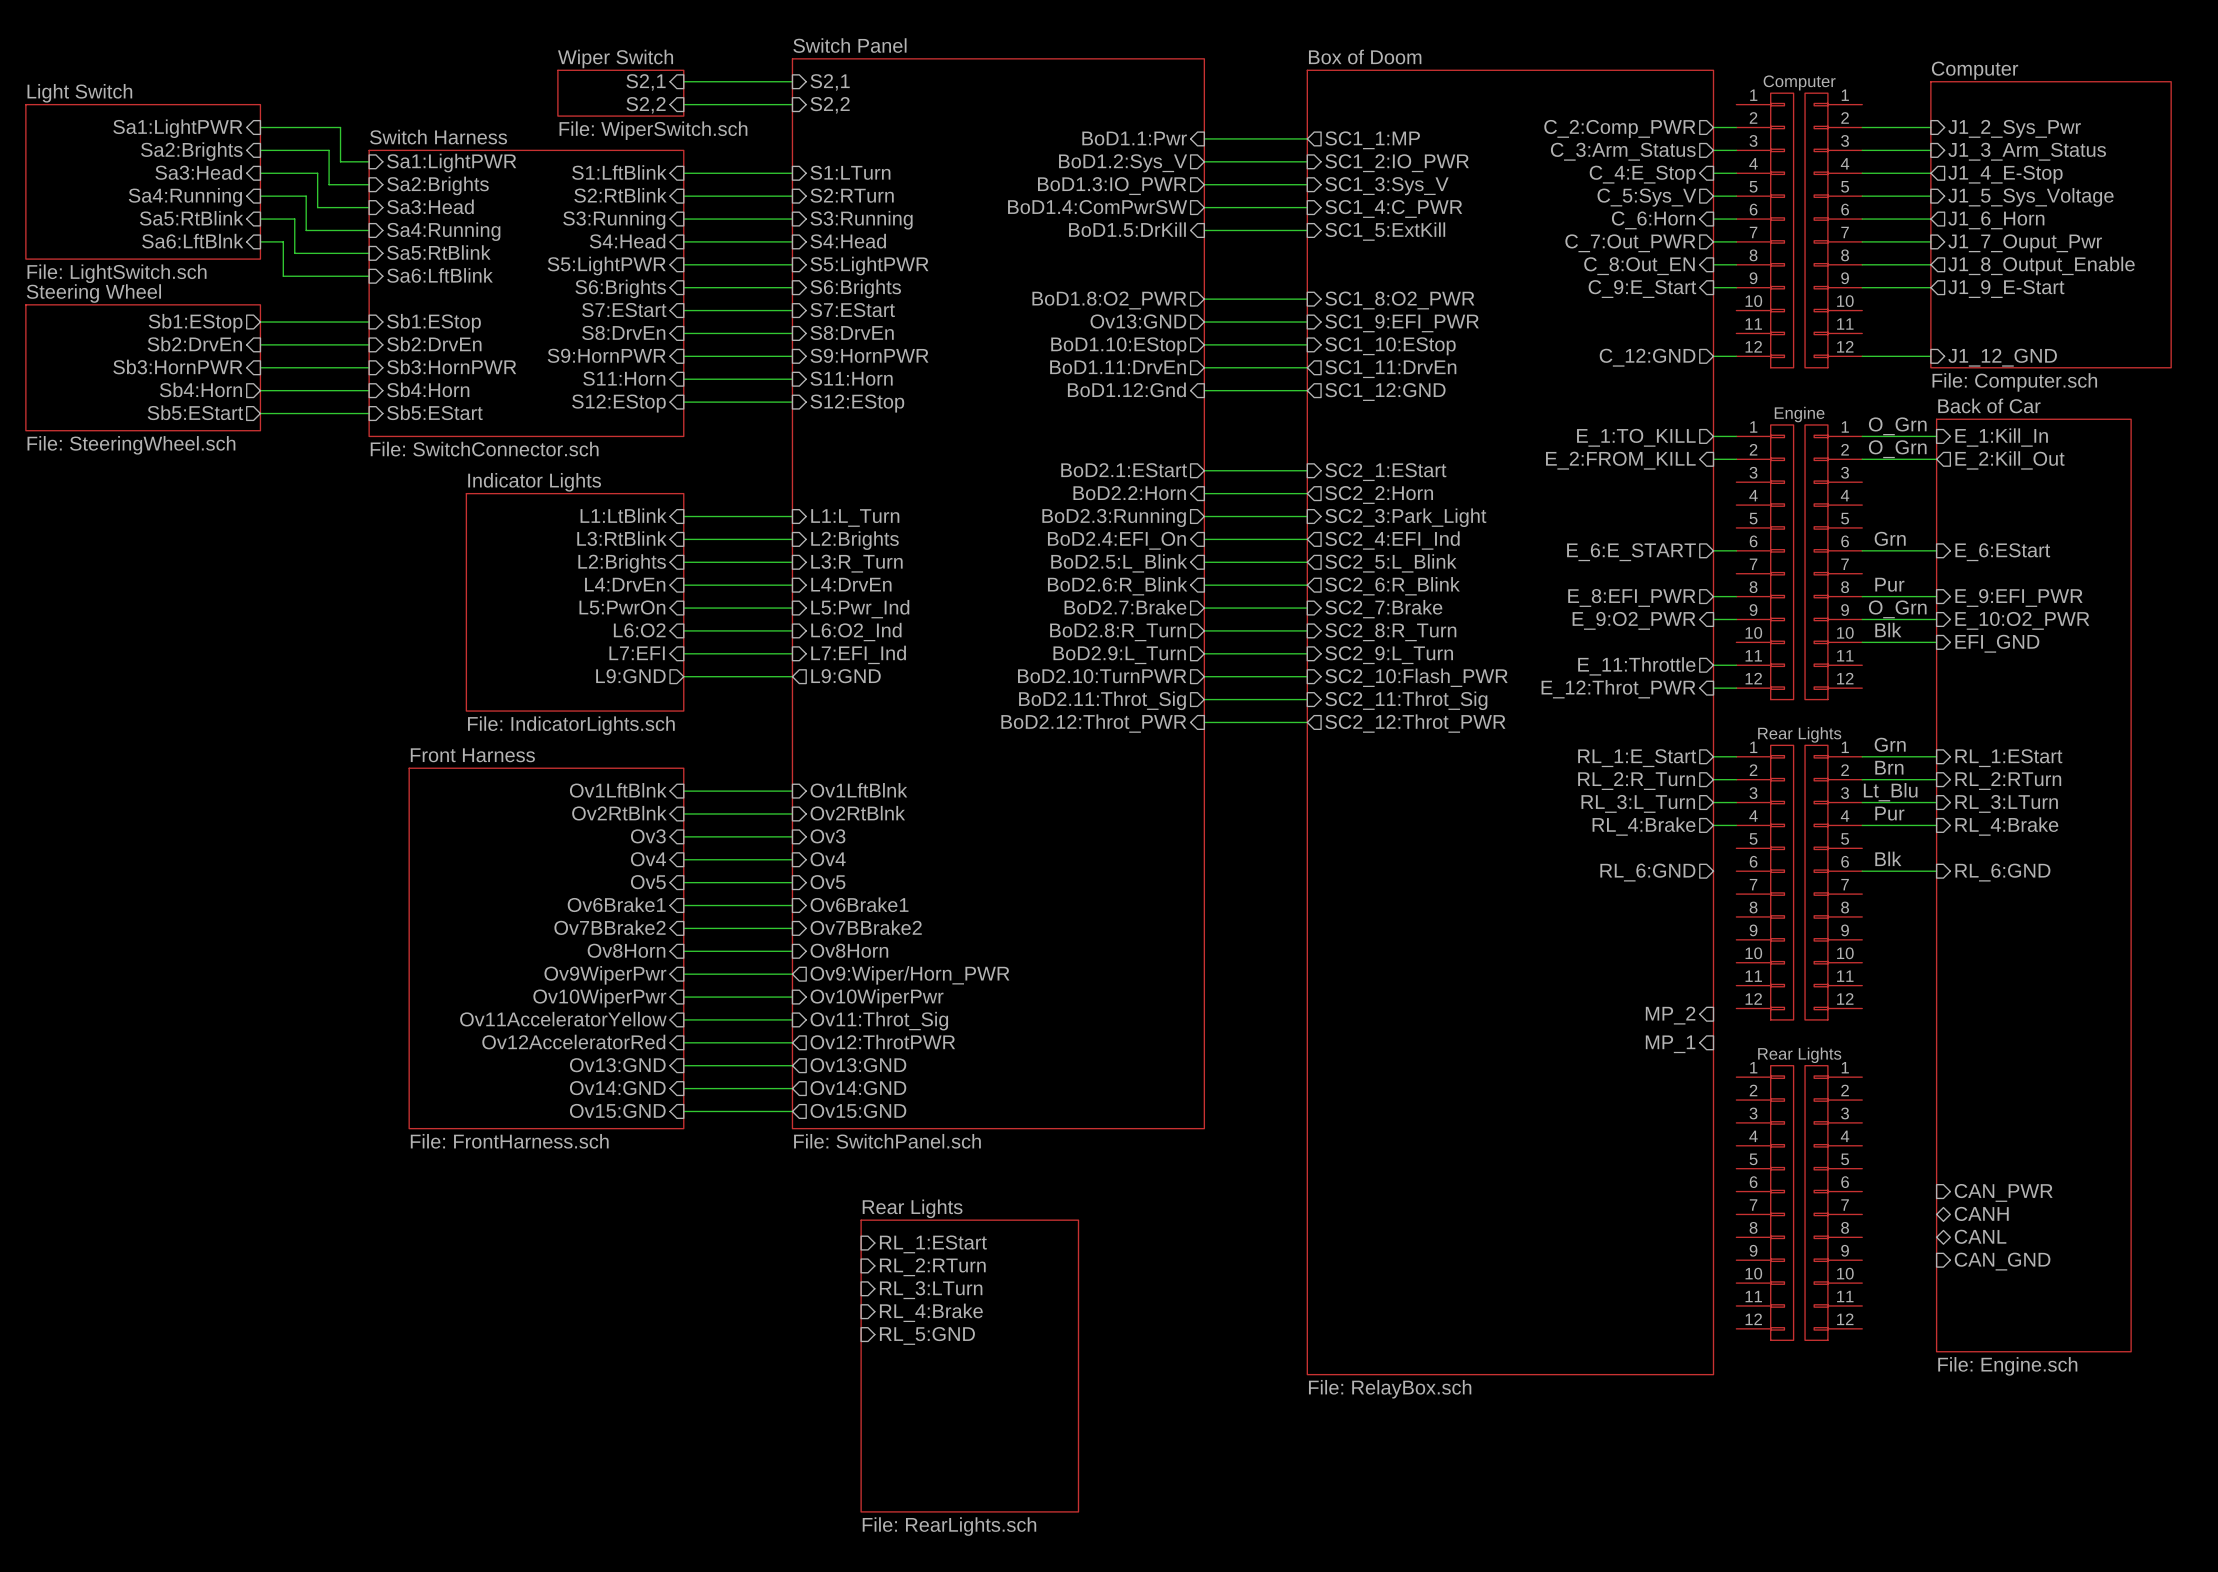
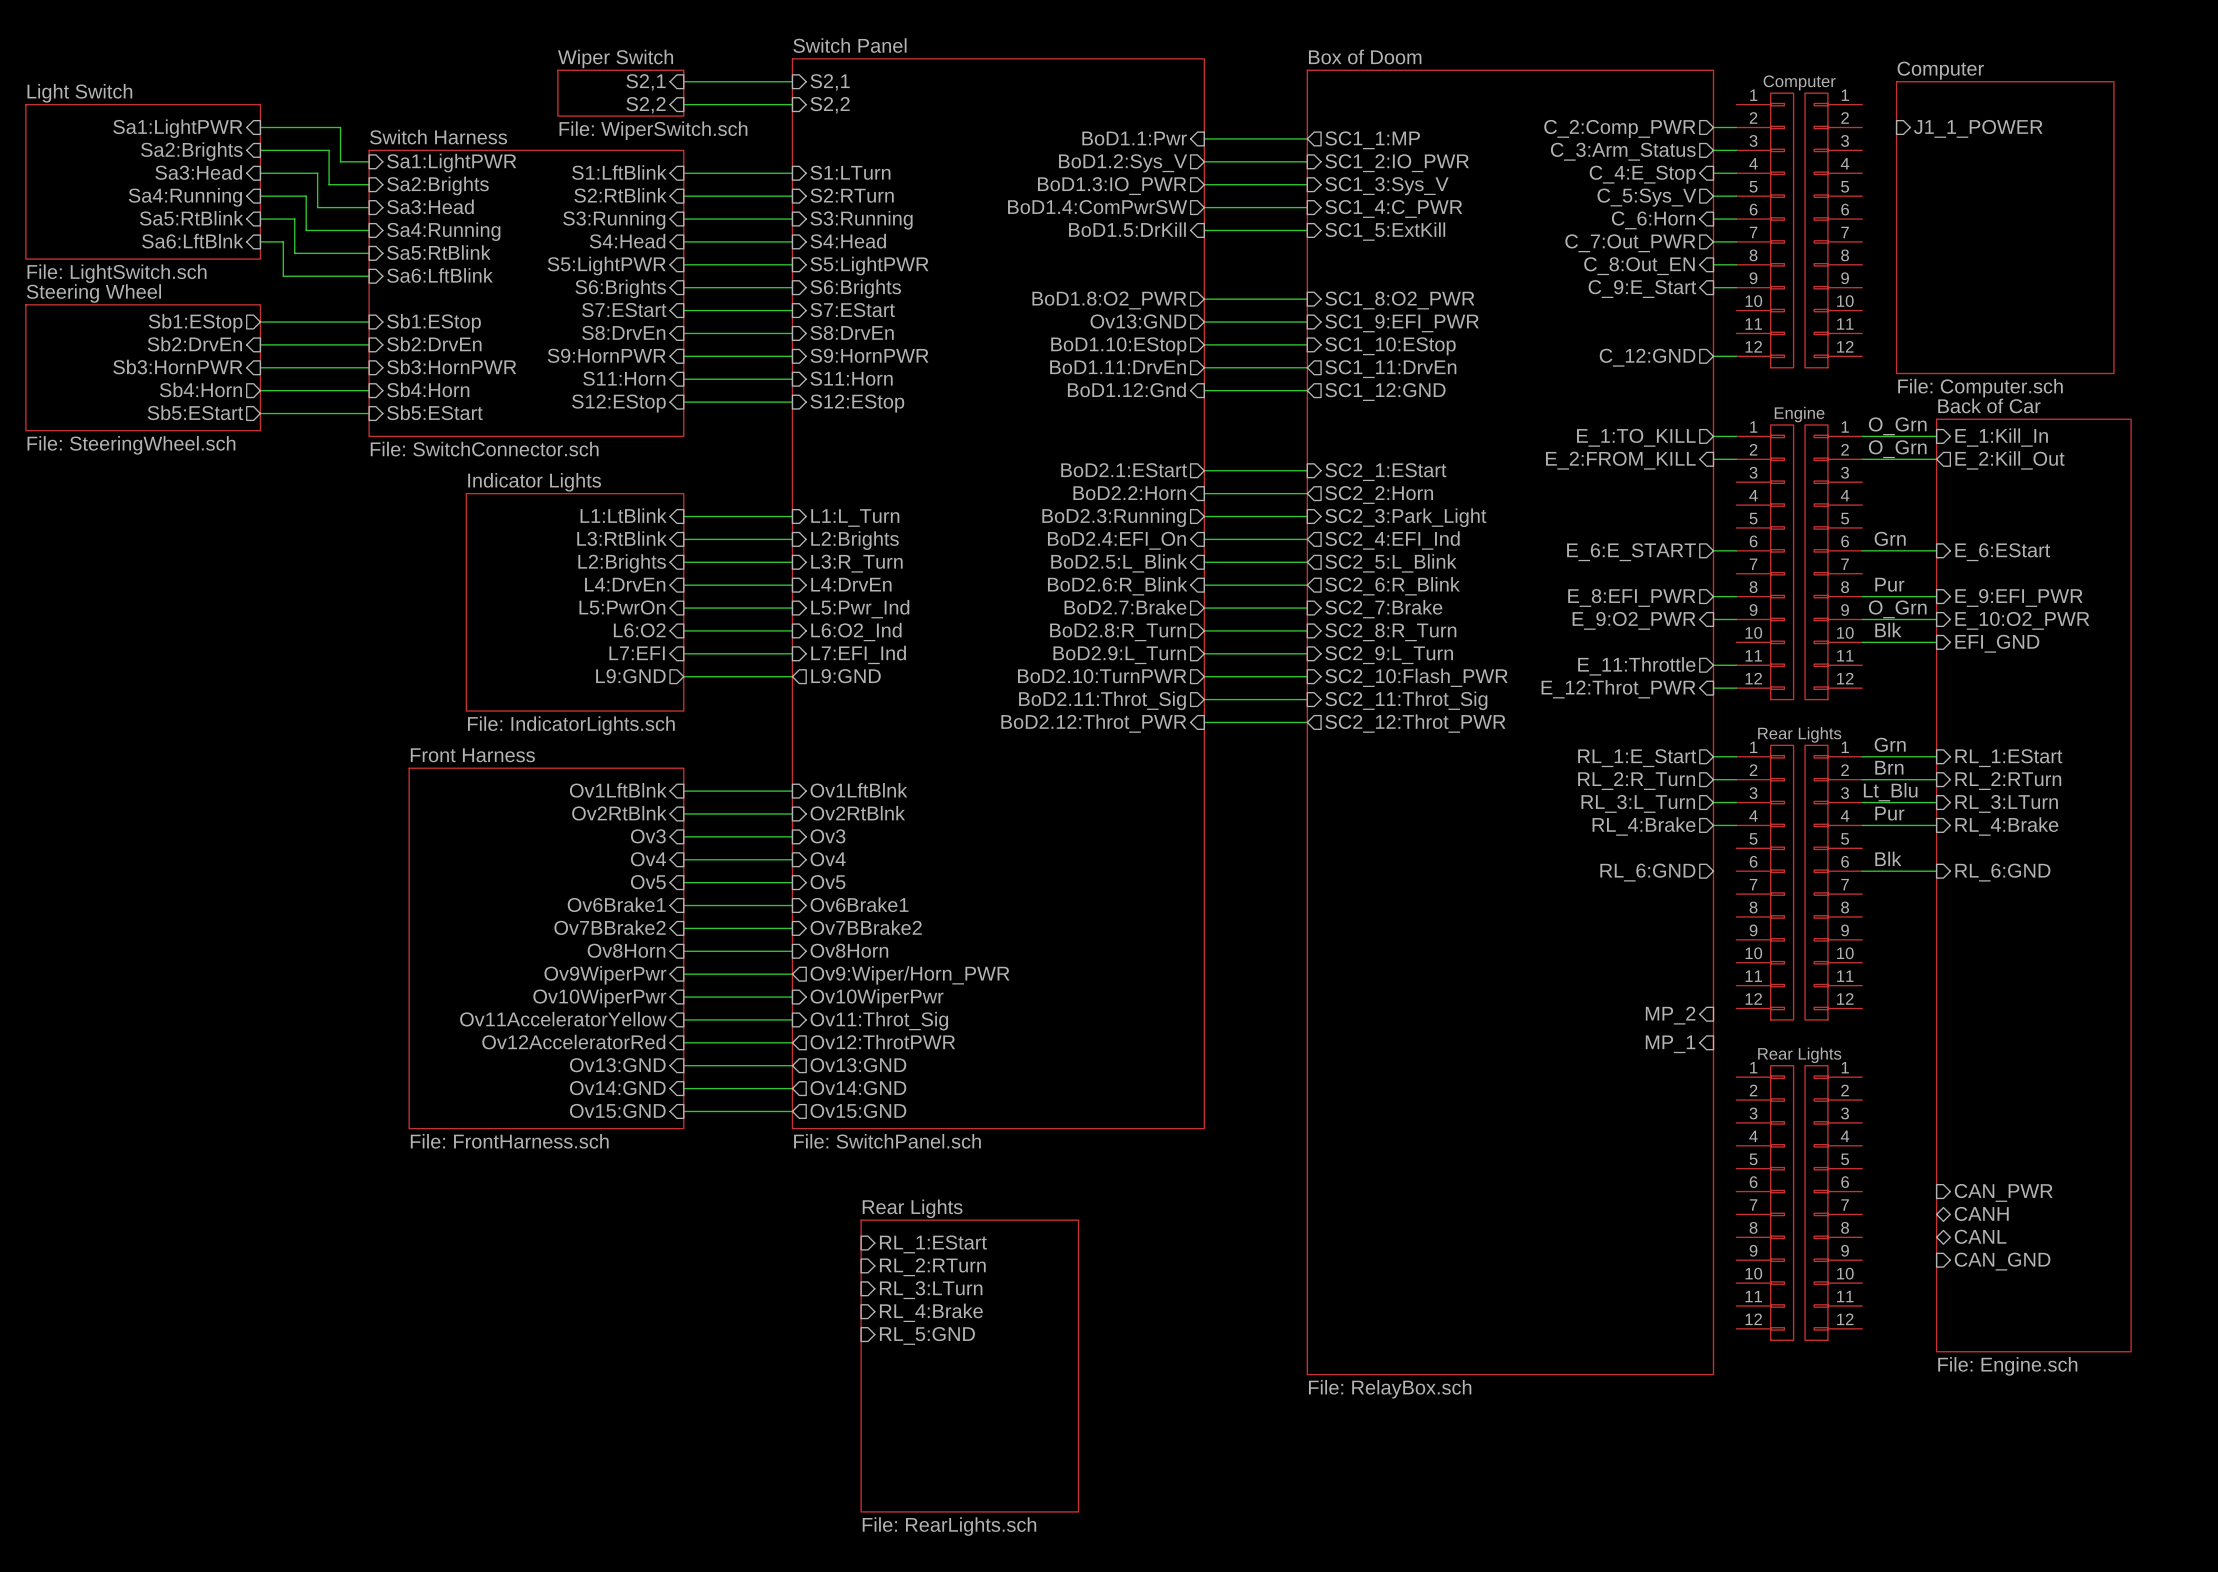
wire: (1862, 127) (1930, 127) -> none
sheet pin: none -> J1_1_POWER (1978, 128)
sheet pin: J1_2_Sys_Pwr (2014, 128) -> none
wire: (1862, 150) (1930, 150) -> none
sheet pin: J1_3_Arm_Status (2027, 151) -> none
wire: (1862, 173) (1930, 173) -> none
sheet pin: J1_4_E-Stop (2005, 174) -> none
wire: (1862, 196) (1930, 196) -> none
sheet pin: J1_5_Sys_Voltage (2030, 197) -> none
wire: (1862, 219) (1930, 219) -> none
sheet pin: J1_6_Horn (1996, 220) -> none
sheet Computer: File: Computer.sch (2051, 224) -> none
sheet Computer: none -> File: Computer.sch (2005, 227)
wire: (1862, 241) (1930, 241) -> none
sheet pin: J1_7_Ouput_Pwr (2025, 243) -> none
wire: (1862, 264) (1930, 264) -> none
sheet pin: J1_8_Output_Enable (2041, 265) -> none
wire: (1862, 287) (1930, 287) -> none
sheet pin: J1_9_E-Start (2006, 289) -> none
wire: (1862, 356) (1930, 356) -> none
sheet pin: J1_12_GND (2002, 357) -> none

